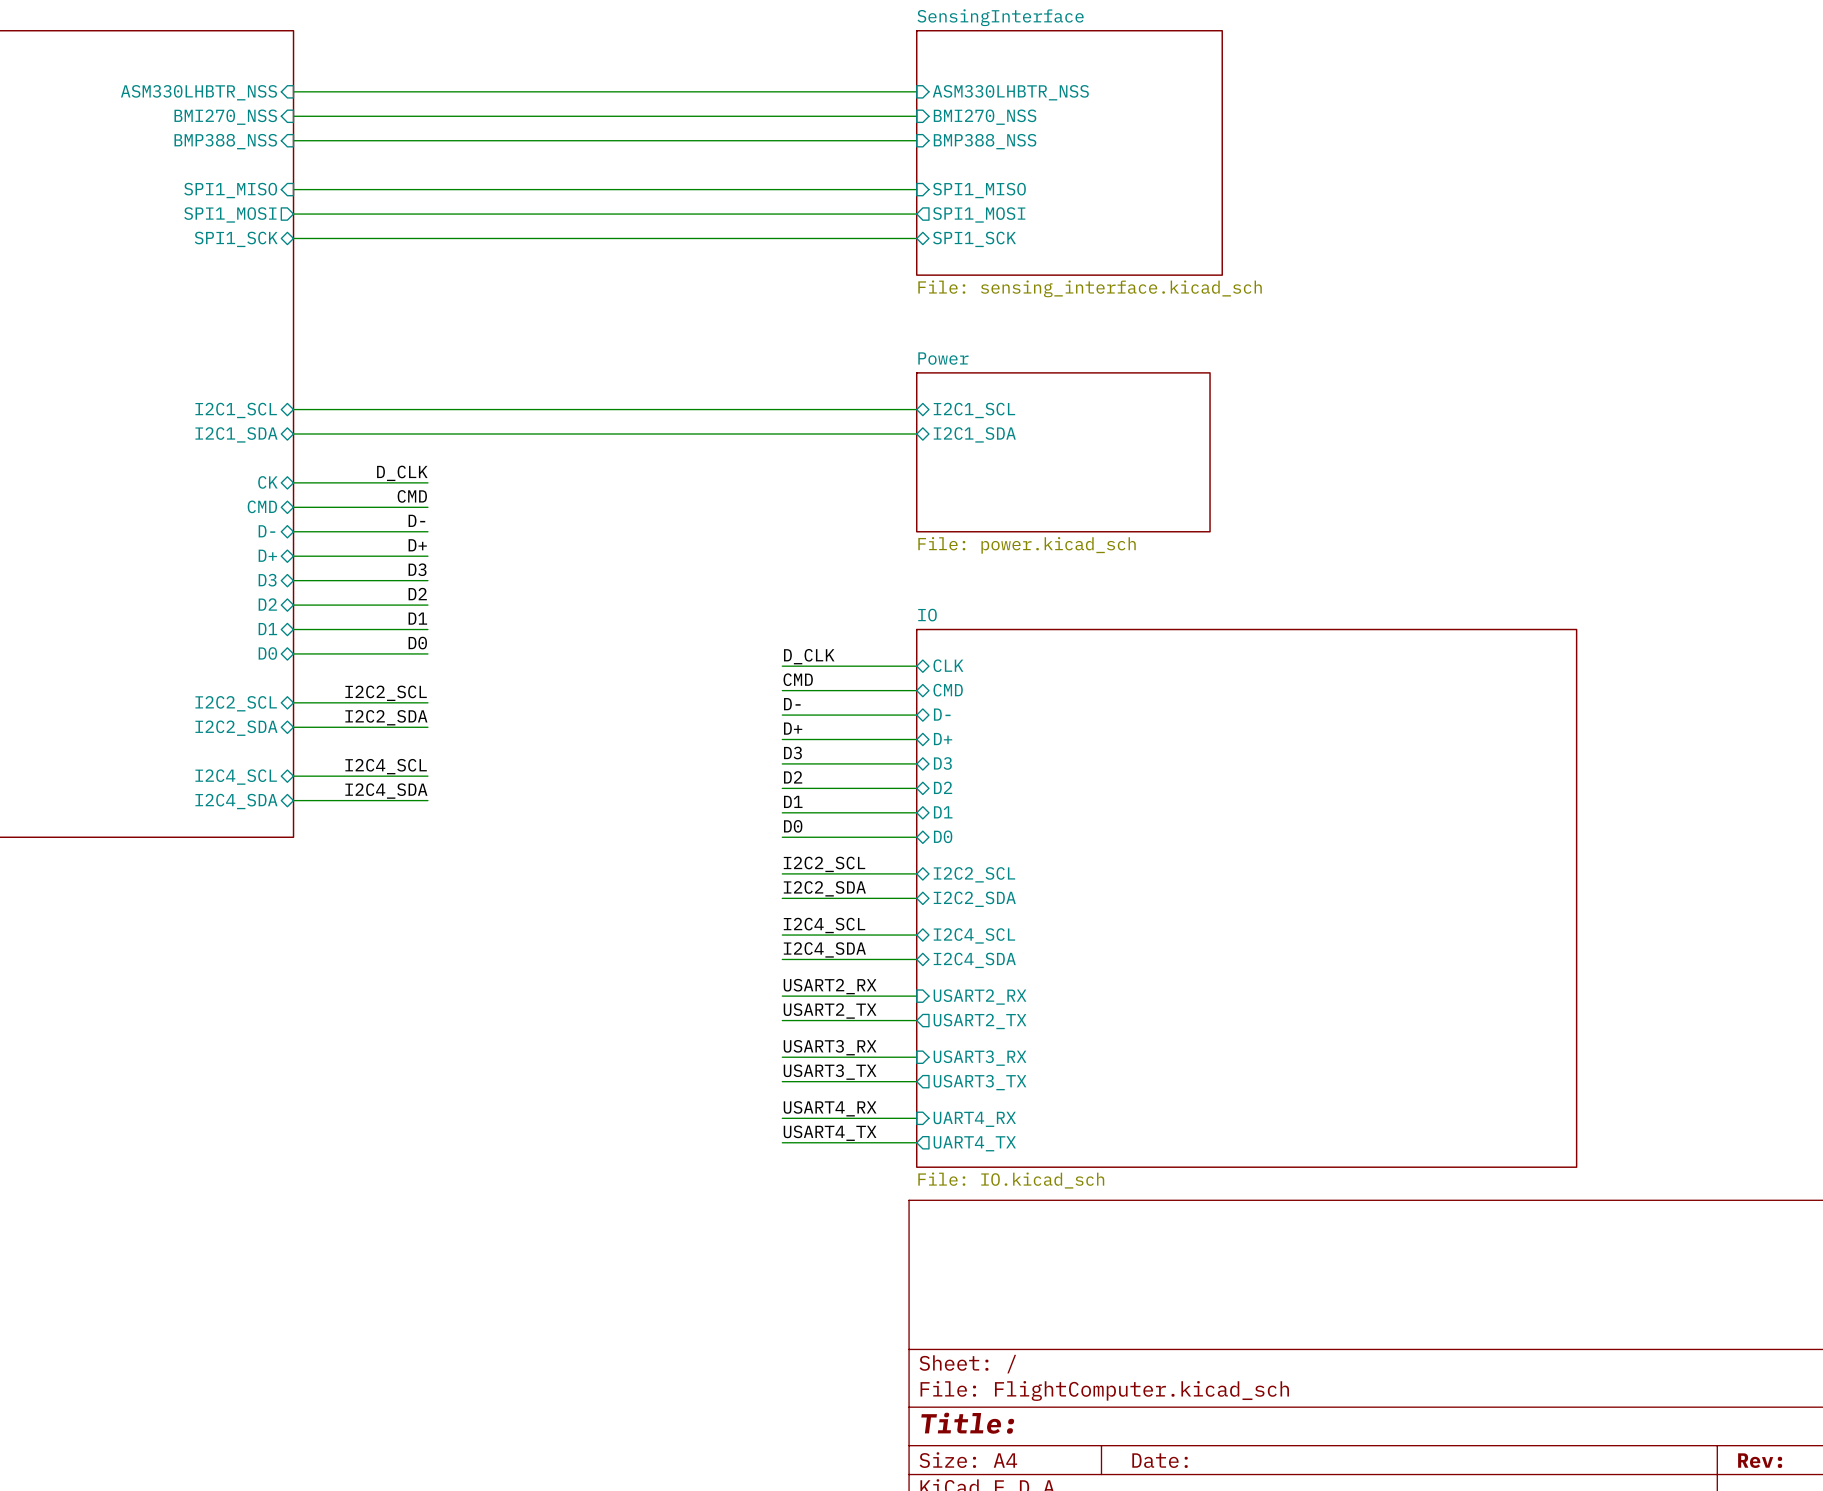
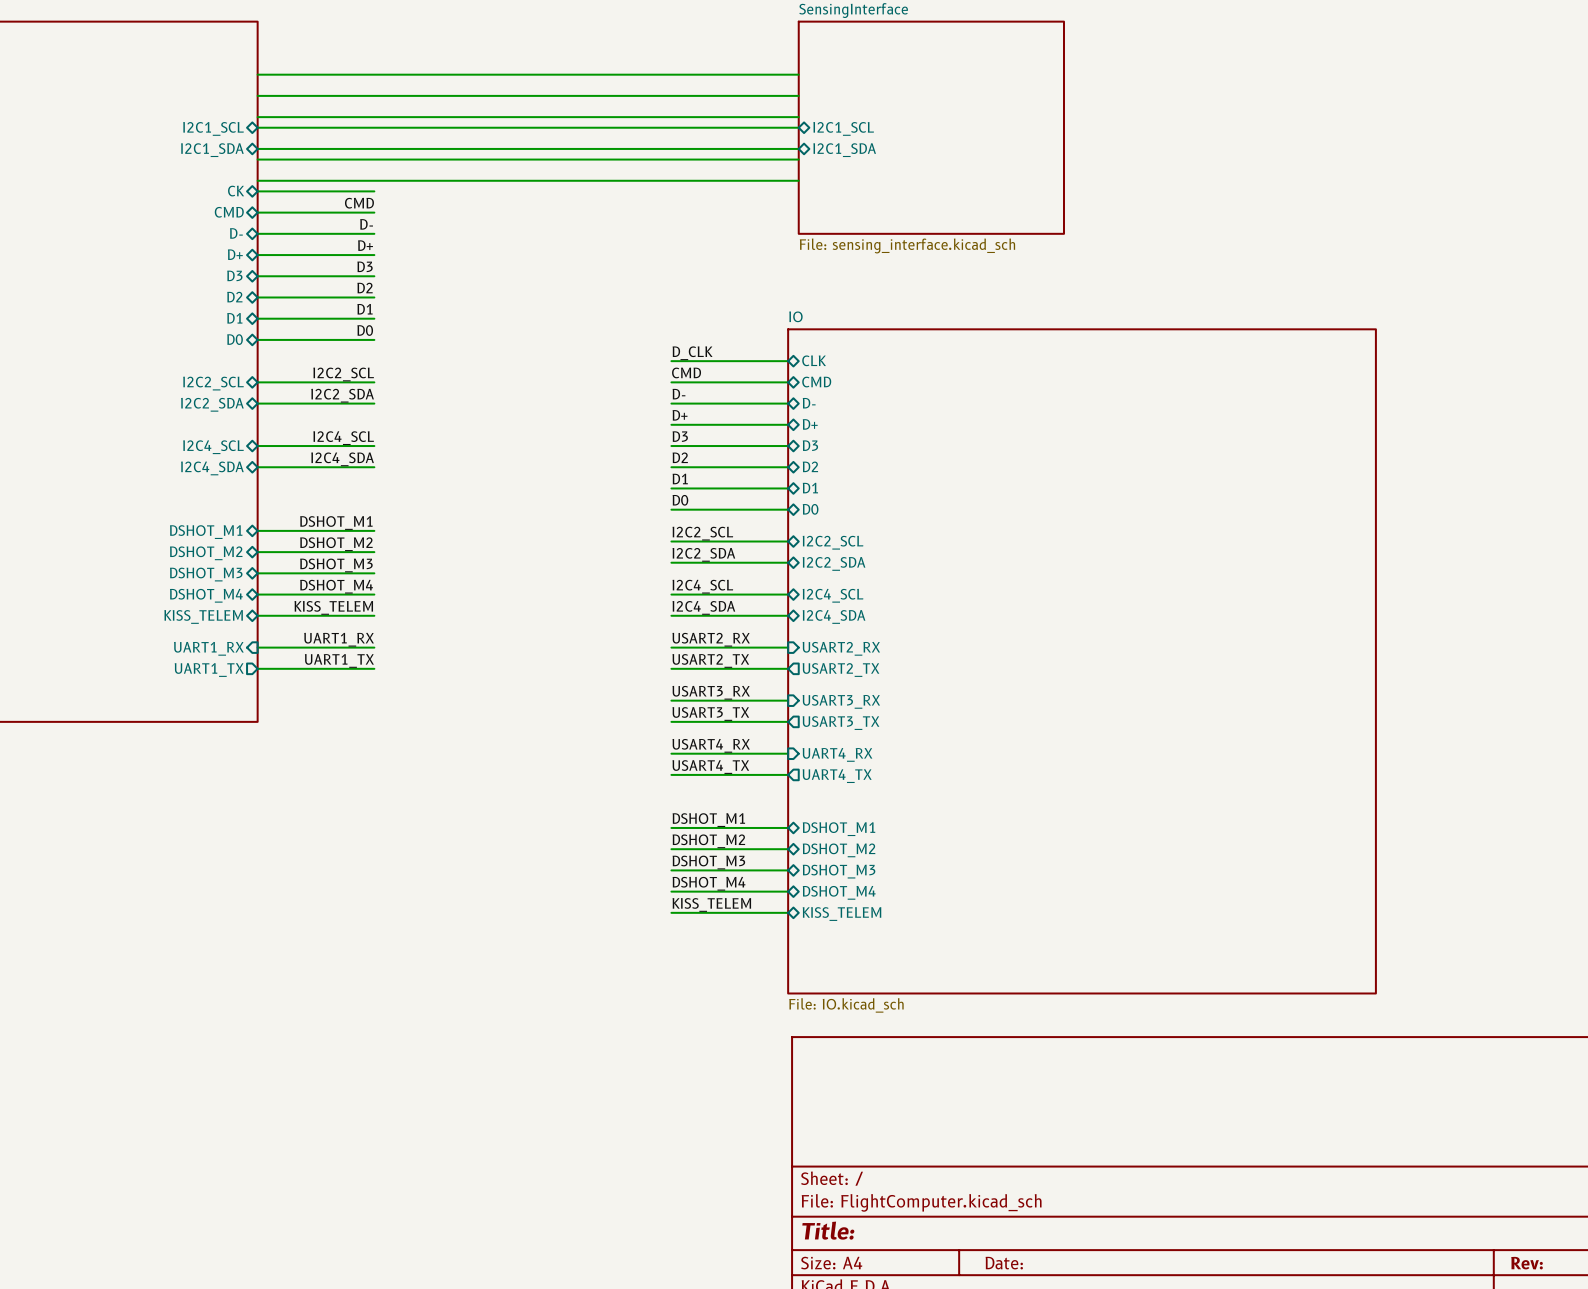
sheet pin: ASM330LHBTR_NSS (198, 92) -> none
sheet pin: ASM330LHBTR_NSS (1010, 92) -> none
sheet pin: BMI270_NSS (225, 117) -> none
sheet pin: BMI270_NSS (985, 117) -> none
sheet pin: BMP388_NSS (225, 141) -> none
sheet pin: BMP388_NSS (985, 141) -> none
sheet pin: none -> I2C1_SCL (213, 128)
sheet pin: none -> I2C1_SCL (843, 128)
sheet pin: none -> I2C1_SDA (212, 150)
sheet pin: none -> I2C1_SDA (844, 150)
sheet pin: SPI1_MISO (230, 190) -> none
sheet pin: SPI1_MISO (979, 190) -> none
sheet pin: SPI1_MOSI (230, 214) -> none
sheet pin: SPI1_MOSI (979, 214) -> none
sheet pin: none -> CK (236, 191)
wire: none -> (257, 191) (374, 191)
wire: (293, 238) (916, 238) -> (257, 127) (798, 127)
sheet pin: SPI1_SCK (236, 239) -> none
label: none -> CMD (359, 203)
sheet pin: SPI1_SCK (974, 239) -> none
sheet pin: none -> CMD (229, 212)
label: none -> D- (366, 224)
sheet pin: none -> D- (236, 233)
label: none -> D+ (365, 245)
sheet pin: none -> D+ (235, 254)
label: none -> D3 (365, 266)
sheet pin: none -> D3 (234, 275)
label: none -> D2 (365, 288)
sheet pin: none -> D2 (234, 297)
label: none -> D1 (365, 309)
sheet pin: none -> D1 (234, 318)
label: none -> D0 (365, 330)
sheet pin: none -> D0 (235, 339)
wire: (293, 409) (916, 409) -> (257, 148) (798, 148)
sheet pin: I2C1_SCL (236, 410) -> none
sheet pin: I2C1_SCL (974, 410) -> none
label: none -> D_CLK (692, 353)
wire: none -> (671, 361) (788, 361)
sheet pin: none -> CLK (814, 360)
sheet pin: I2C1_SDA (236, 434) -> I2C2_SCL (213, 383)
wire: (293, 434) (916, 434) -> none
sheet pin: I2C1_SDA (974, 434) -> none
label: none -> CMD (686, 372)
label: none -> I2C2_SCL (343, 374)
sheet pin: none -> CMD (816, 382)
wire: none -> (257, 382) (374, 382)
wire: none -> (671, 382) (788, 382)
sheet Power: File: power.kicad_sch (1063, 452) -> none
label: none -> D- (679, 394)
label: none -> I2C2_SDA (342, 395)
wire: none -> (671, 403) (788, 403)
sheet pin: none -> D- (809, 403)
sheet pin: none -> I2C2_SDA (212, 404)
label: D_CLK (402, 473) -> none
sheet pin: CK (267, 482) -> none
wire: (293, 482) (427, 482) -> (257, 212) (374, 212)
label: none -> D+ (680, 415)
sheet pin: none -> D+ (810, 424)
wire: none -> (671, 424) (788, 424)
label: CMD (412, 496) -> none
sheet pin: CMD (262, 506) -> none
wire: (293, 507) (427, 507) -> (257, 233) (374, 233)
label: none -> D3 (680, 436)
label: none -> I2C4_SCL (343, 438)
sheet pin: none -> D3 (810, 445)
sheet pin: none -> I2C4_SCL (213, 447)
label: D- (416, 520) -> none
sheet pin: D- (266, 531) -> none
wire: (293, 531) (427, 531) -> (257, 255) (374, 255)
label: none -> D2 (680, 457)
label: none -> I2C4_SDA (342, 459)
wire: none -> (671, 467) (788, 467)
sheet pin: none -> D2 (810, 466)
sheet pin: none -> I2C4_SDA (212, 468)
label: D+ (417, 545) -> none
sheet pin: D+ (267, 555) -> none
wire: (293, 556) (427, 556) -> (257, 276) (374, 276)
label: none -> D1 (680, 478)
sheet pin: none -> D1 (810, 488)
wire: none -> (671, 488) (788, 488)
label: D3 (417, 569) -> none
sheet pin: D3 (267, 580) -> none
wire: (293, 580) (427, 580) -> (257, 297) (374, 297)
label: none -> D0 (680, 500)
wire: none -> (671, 509) (788, 509)
sheet pin: none -> D0 (810, 509)
label: D2 (417, 594) -> none
sheet pin: D2 (267, 604) -> none
wire: (293, 605) (427, 605) -> (257, 318) (374, 318)
label: none -> DSHOT_M1 (336, 523)
sheet pin: none -> DSHOT_M1 (206, 532)
label: D1 (417, 618) -> none
label: none -> I2C2_SCL (702, 533)
sheet pin: D1 (267, 629) -> none
wire: (293, 629) (427, 629) -> (257, 339) (374, 339)
wire: none -> (671, 541) (788, 541)
sheet pin: none -> I2C2_SCL (833, 542)
label: none -> DSHOT_M2 (336, 544)
wire: none -> (257, 552) (374, 552)
sheet pin: none -> DSHOT_M2 (206, 553)
label: D0 (417, 643) -> none
label: none -> I2C2_SDA (703, 554)
sheet pin: D0 (267, 653) -> none
wire: (293, 653) (427, 653) -> (257, 446) (374, 446)
sheet pin: none -> I2C2_SDA (834, 563)
label: none -> DSHOT_M3 (336, 565)
label: D_CLK (809, 656) -> none
sheet pin: CLK (948, 665) -> none
wire: none -> (257, 573) (374, 573)
wire: (782, 666) (916, 666) -> (671, 562) (788, 562)
sheet pin: none -> DSHOT_M3 (206, 574)
label: CMD (798, 679) -> none
label: none -> DSHOT_M4 (336, 586)
label: none -> I2C4_SCL (702, 586)
wire: none -> (257, 594) (374, 594)
wire: (904, 690) (916, 690) -> (671, 594) (682, 594)
sheet pin: CMD (948, 690) -> none
sheet pin: none -> DSHOT_M4 (206, 595)
sheet pin: none -> I2C4_SCL (833, 595)
label: I2C2_SCL (386, 693) -> none
wire: (293, 702) (427, 702) -> (257, 403) (374, 403)
sheet pin: I2C2_SCL (236, 703) -> none
label: D- (792, 704) -> none
label: none -> KISS_TELEM (333, 607)
label: none -> I2C4_SDA (703, 607)
sheet pin: D- (942, 714) -> none
sheet pin: none -> KISS_TELEM (203, 616)
wire: none -> (257, 615) (374, 615)
wire: (904, 715) (916, 715) -> (671, 615) (682, 615)
sheet pin: none -> I2C4_SDA (834, 616)
label: I2C2_SDA (386, 717) -> none
wire: (293, 727) (427, 727) -> (257, 467) (374, 467)
sheet pin: I2C2_SDA (236, 728) -> none
label: D+ (793, 728) -> none
wire: (782, 739) (916, 739) -> (671, 446) (788, 446)
sheet pin: D+ (943, 739) -> none
label: none -> UART1_RX (339, 639)
label: none -> USART2_RX (711, 639)
wire: none -> (257, 647) (374, 647)
sheet pin: none -> UART1_RX (208, 648)
sheet pin: none -> USART2_RX (841, 648)
label: D3 (792, 753) -> none
wire: (782, 763) (916, 763) -> (671, 647) (788, 647)
sheet pin: D3 (942, 763) -> none
label: I2C4_SCL (386, 766) -> UART1_TX (339, 660)
label: none -> USART2_TX (710, 660)
sheet IO: none -> File: IO.kicad_sch (1082, 661)
sheet pin shape: bidirectional (236, 777) -> output (209, 670)
sheet pin: I2C4_SCL (236, 777) -> UART1_TX (209, 670)
label: D2 (793, 777) -> none
sheet pin: none -> USART2_TX (840, 670)
sheet pin: D2 (943, 787) -> none
wire: (782, 788) (916, 788) -> (671, 668) (788, 668)
label: I2C4_SDA (386, 791) -> none
wire: (293, 800) (427, 800) -> (257, 530) (374, 530)
sheet pin: I2C4_SDA (236, 801) -> none
label: D1 (793, 801) -> none
label: none -> USART3_RX (711, 692)
wire: (904, 812) (916, 812) -> (671, 700) (682, 700)
sheet pin: D1 (943, 812) -> none
sheet pin: none -> USART3_RX (841, 701)
label: D0 (793, 826) -> none
label: none -> USART3_TX (710, 713)
sheet pin: D0 (943, 836) -> none
wire: (904, 837) (916, 837) -> (671, 721) (682, 721)
sheet pin: none -> USART3_TX (840, 723)
label: none -> USART4_RX (711, 745)
label: I2C2_SCL (824, 864) -> none
wire: (904, 873) (916, 873) -> (671, 753) (682, 753)
sheet pin: none -> UART4_RX (837, 754)
sheet pin: I2C2_SCL (974, 874) -> none
label: none -> USART4_TX (710, 767)
label: I2C2_SDA (824, 888) -> none
wire: (904, 898) (916, 898) -> (671, 774) (682, 774)
sheet IO: File: IO.kicad_sch (1246, 898) -> none
sheet pin: none -> UART4_TX (837, 776)
sheet pin: I2C2_SDA (974, 899) -> none
label: I2C4_SCL (824, 925) -> none
wire: (782, 935) (916, 935) -> none
sheet pin: I2C4_SCL (974, 935) -> none
label: none -> DSHOT_M1 (708, 820)
label: I2C4_SDA (824, 949) -> none
wire: (904, 959) (916, 959) -> (671, 827) (682, 827)
sheet pin: none -> DSHOT_M1 (839, 829)
sheet pin: I2C4_SDA (974, 960) -> none
label: none -> DSHOT_M2 (708, 841)
sheet pin: none -> DSHOT_M2 (839, 850)
label: USART2_RX (830, 986) -> none
wire: (782, 996) (916, 996) -> (671, 849) (788, 849)
sheet pin: USART2_RX (980, 997) -> none
label: none -> DSHOT_M3 (708, 862)
sheet pin: none -> DSHOT_M3 (839, 871)
label: USART2_TX (830, 1011) -> none
wire: (782, 1020) (916, 1020) -> (671, 870) (788, 870)
sheet pin: USART2_TX (980, 1021) -> none
label: none -> DSHOT_M4 (709, 883)
sheet pin: none -> DSHOT_M4 (839, 892)
label: none -> KISS_TELEM (711, 904)
label: USART3_RX (830, 1047) -> none
wire: (904, 1057) (916, 1057) -> (671, 912) (682, 912)
sheet pin: none -> KISS_TELEM (841, 914)
sheet pin: USART3_RX (980, 1058) -> none
label: USART3_TX (830, 1072) -> none
wire: (782, 1081) (916, 1081) -> none
sheet pin: USART3_TX (980, 1082) -> none
label: USART4_RX (830, 1108) -> none
wire: (782, 1118) (916, 1118) -> none
sheet pin: UART4_RX (974, 1119) -> none
label: USART4_TX (830, 1133) -> none
wire: (782, 1142) (916, 1142) -> (671, 891) (788, 891)
sheet pin: UART4_TX (974, 1143) -> none

